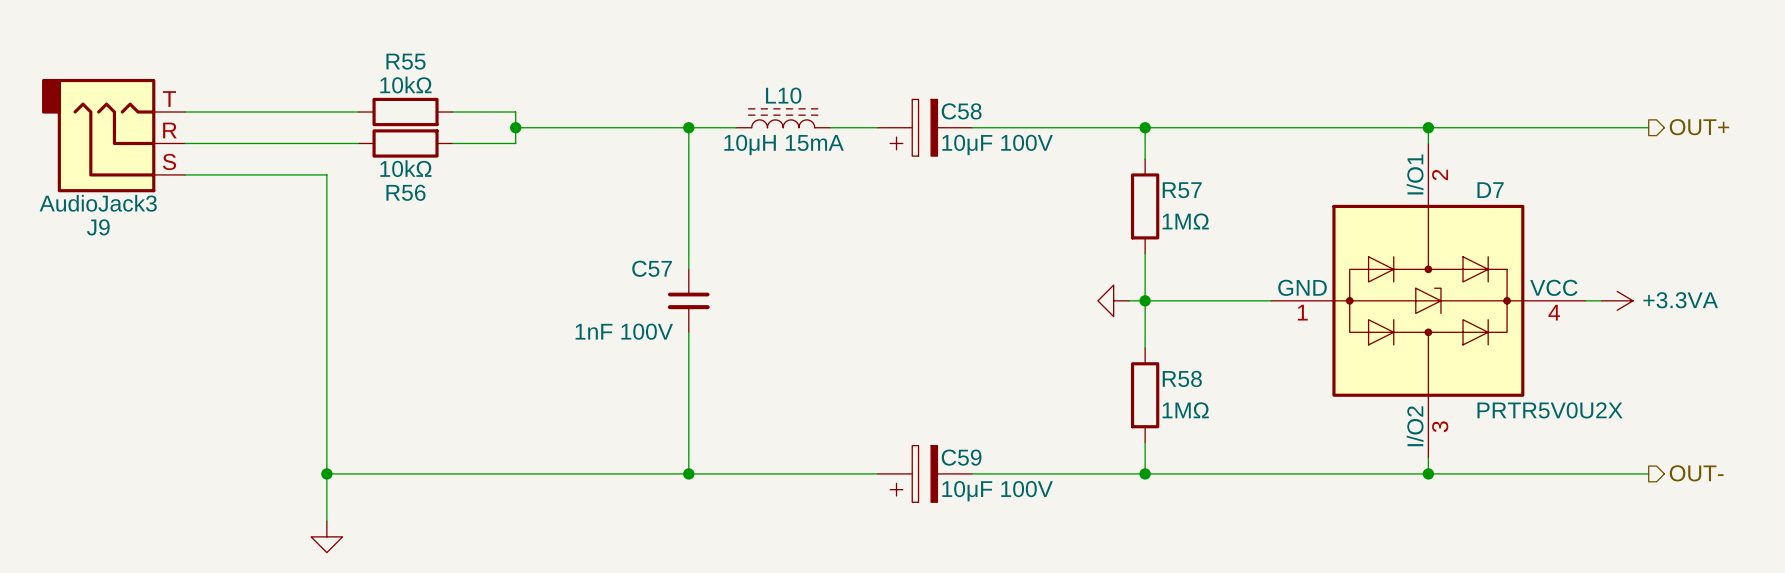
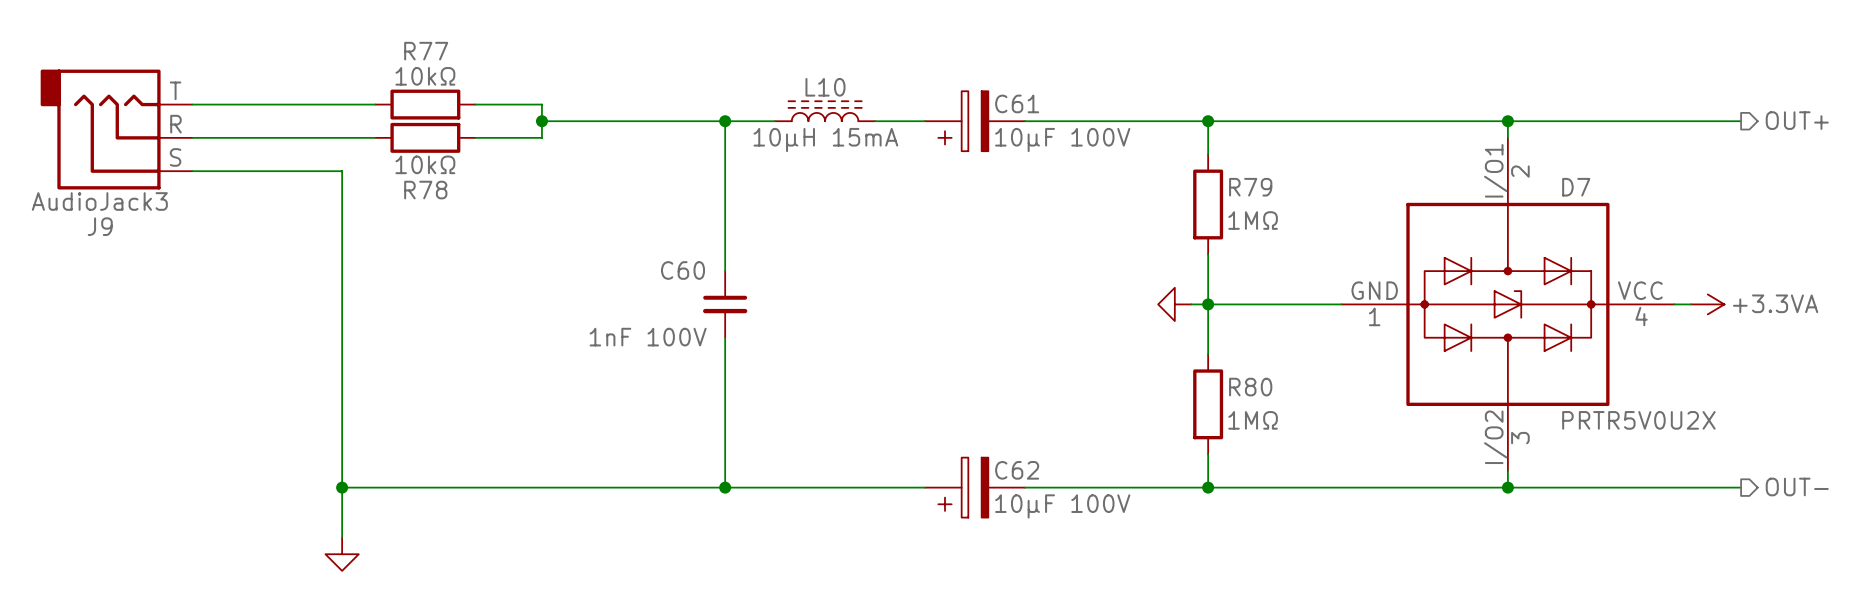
R55 name: R55 (406, 61) -> R77 (426, 51)
C58 name: C58 (961, 111) -> C61 (1017, 103)
R57 name: R57 (1182, 190) -> R79 (1250, 187)
R56 name: R56 (405, 192) -> R78 (425, 190)
C57 name: C57 (652, 268) -> C60 (683, 270)
R58 name: R58 (1182, 378) -> R80 (1250, 387)
C59 name: C59 (961, 457) -> C62 (1017, 470)

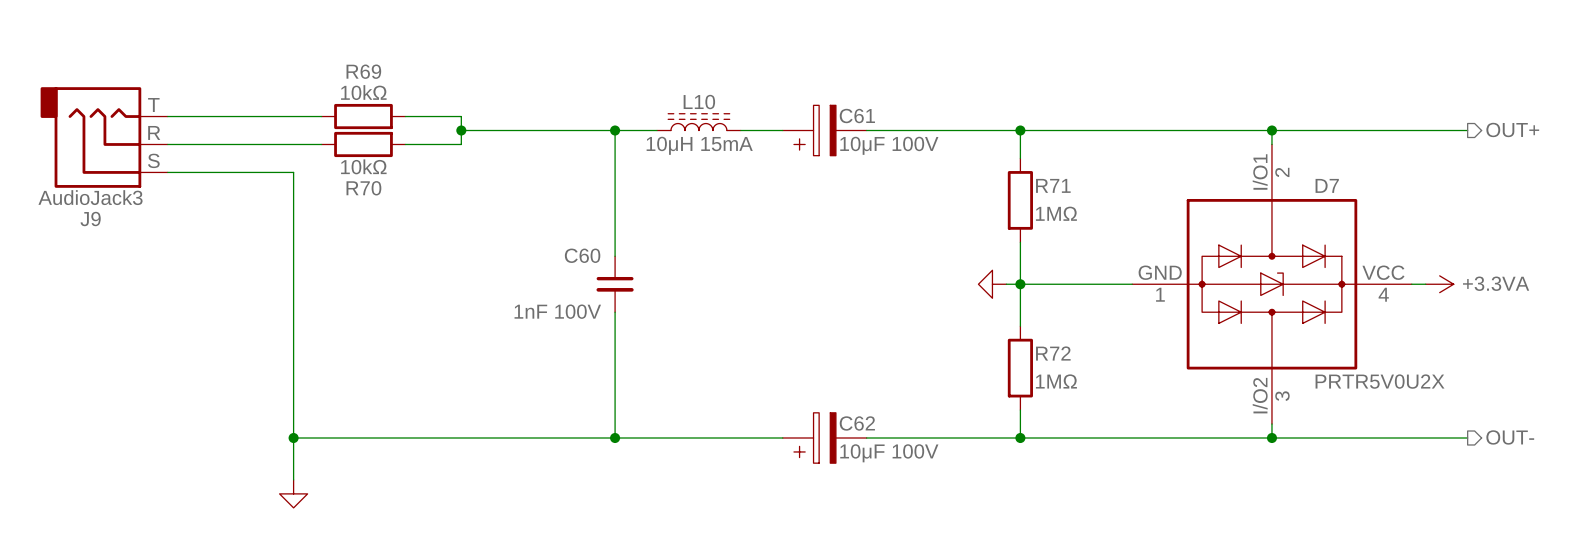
R77 name: R77 (426, 51) -> R69 (363, 71)
R79 name: R79 (1250, 187) -> R71 (1053, 185)
R78 name: R78 (425, 190) -> R70 (363, 188)
R80 name: R80 (1250, 387) -> R72 (1053, 353)

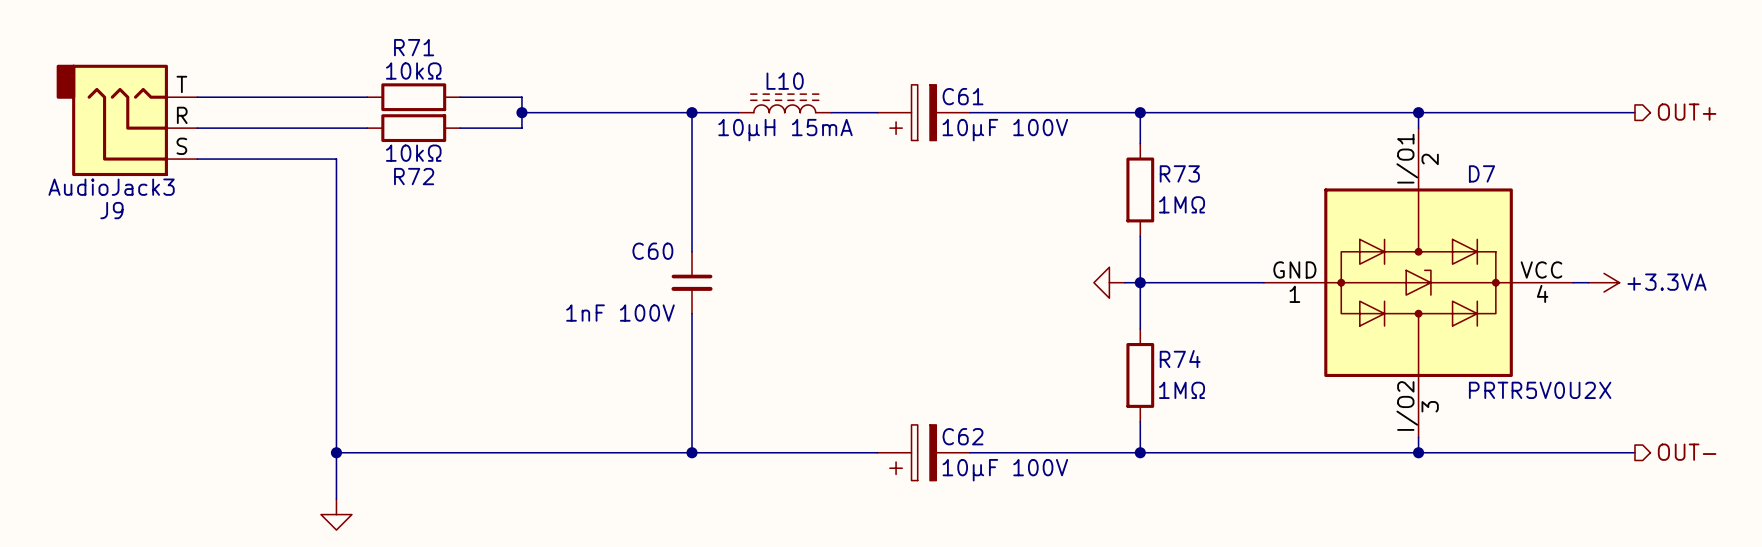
R69 name: R69 (363, 71) -> R71 (414, 47)
R71 name: R71 (1053, 185) -> R73 (1179, 173)
R70 name: R70 (363, 188) -> R72 (414, 176)
R72 name: R72 (1053, 353) -> R74 (1180, 359)

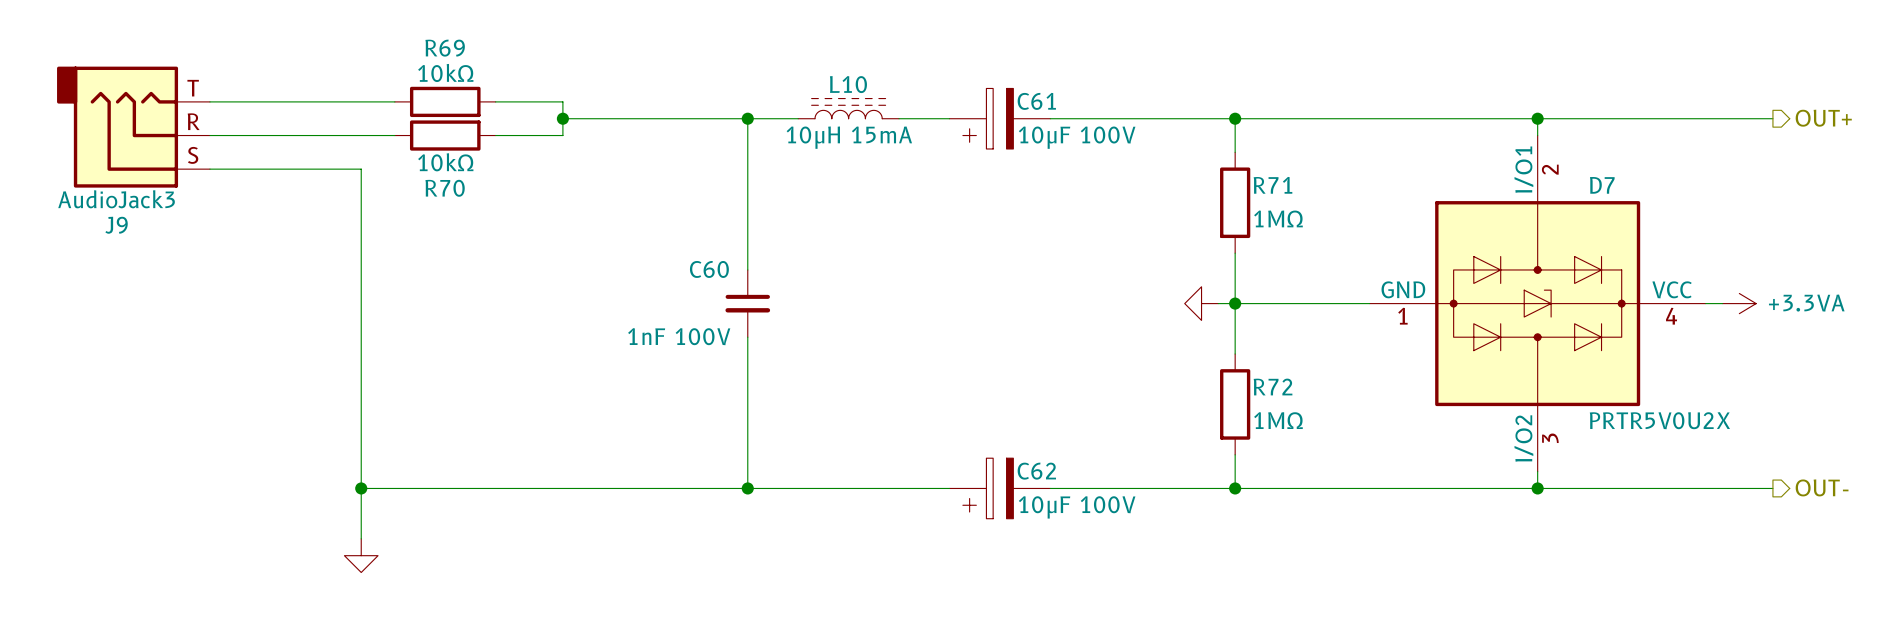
R71 name: R71 (414, 47) -> R69 (445, 48)
R73 name: R73 (1179, 173) -> R71 (1273, 185)
R72 name: R72 (414, 176) -> R70 (445, 188)
R74 name: R74 (1180, 359) -> R72 (1273, 387)

